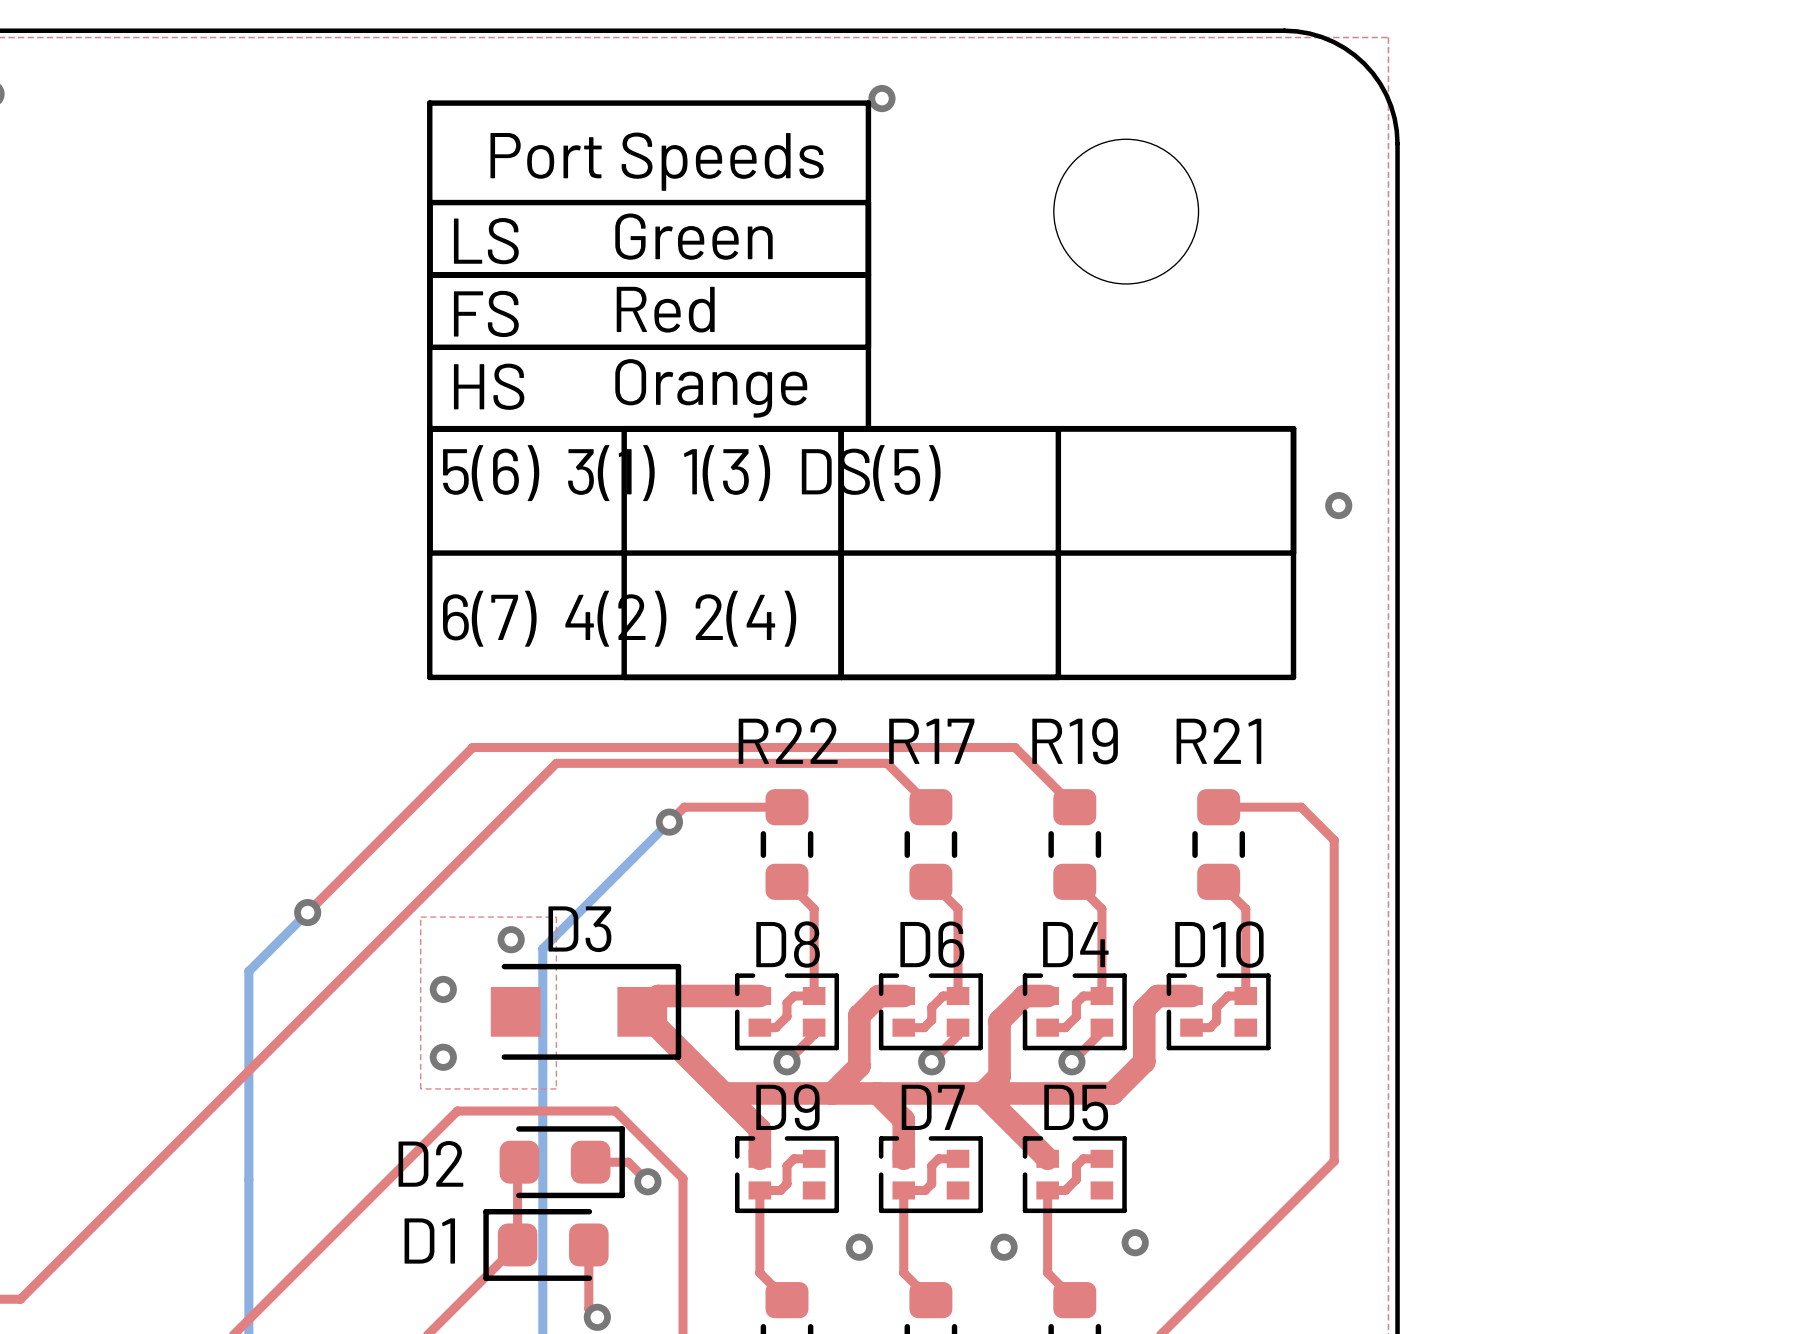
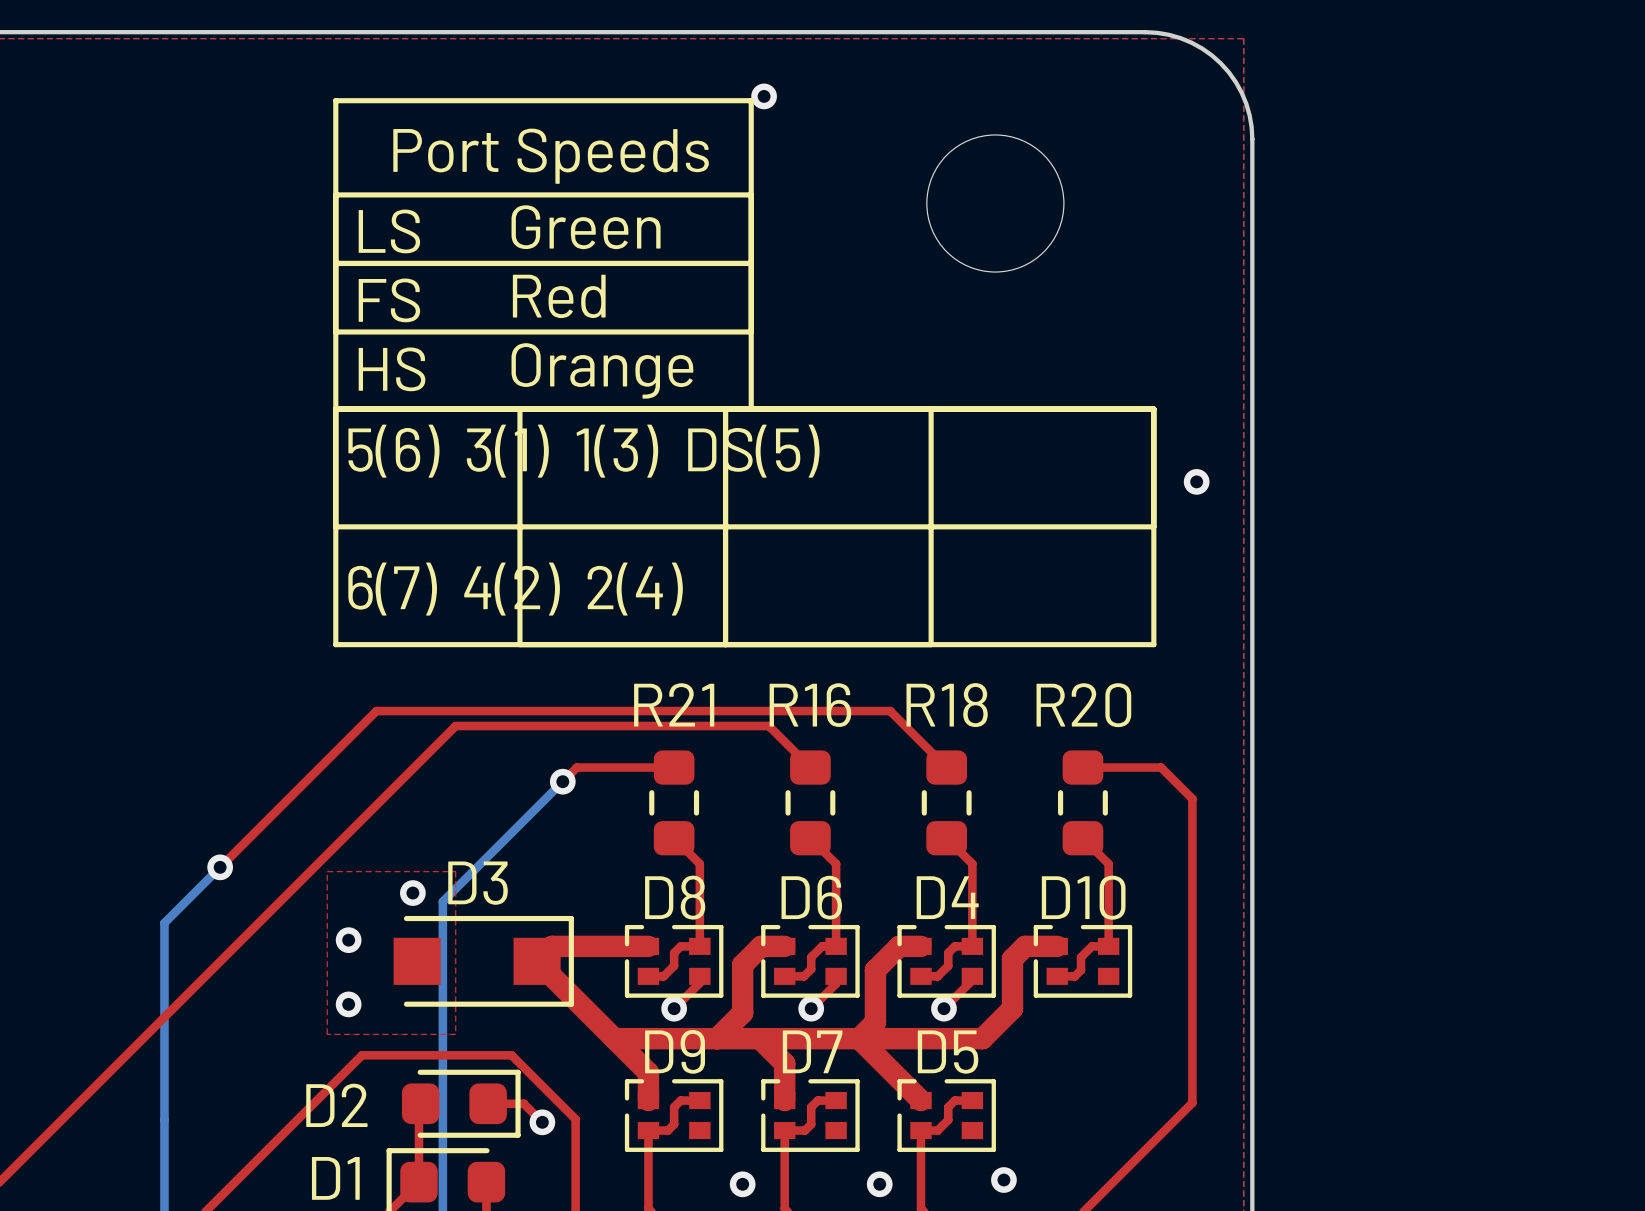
R22 name: R22 (788, 741) -> R21 (674, 704)
R17 name: R17 (931, 741) -> R16 (810, 705)
R19 name: R19 (1075, 741) -> R18 (947, 705)
R21 name: R21 (1218, 741) -> R20 (1083, 705)

